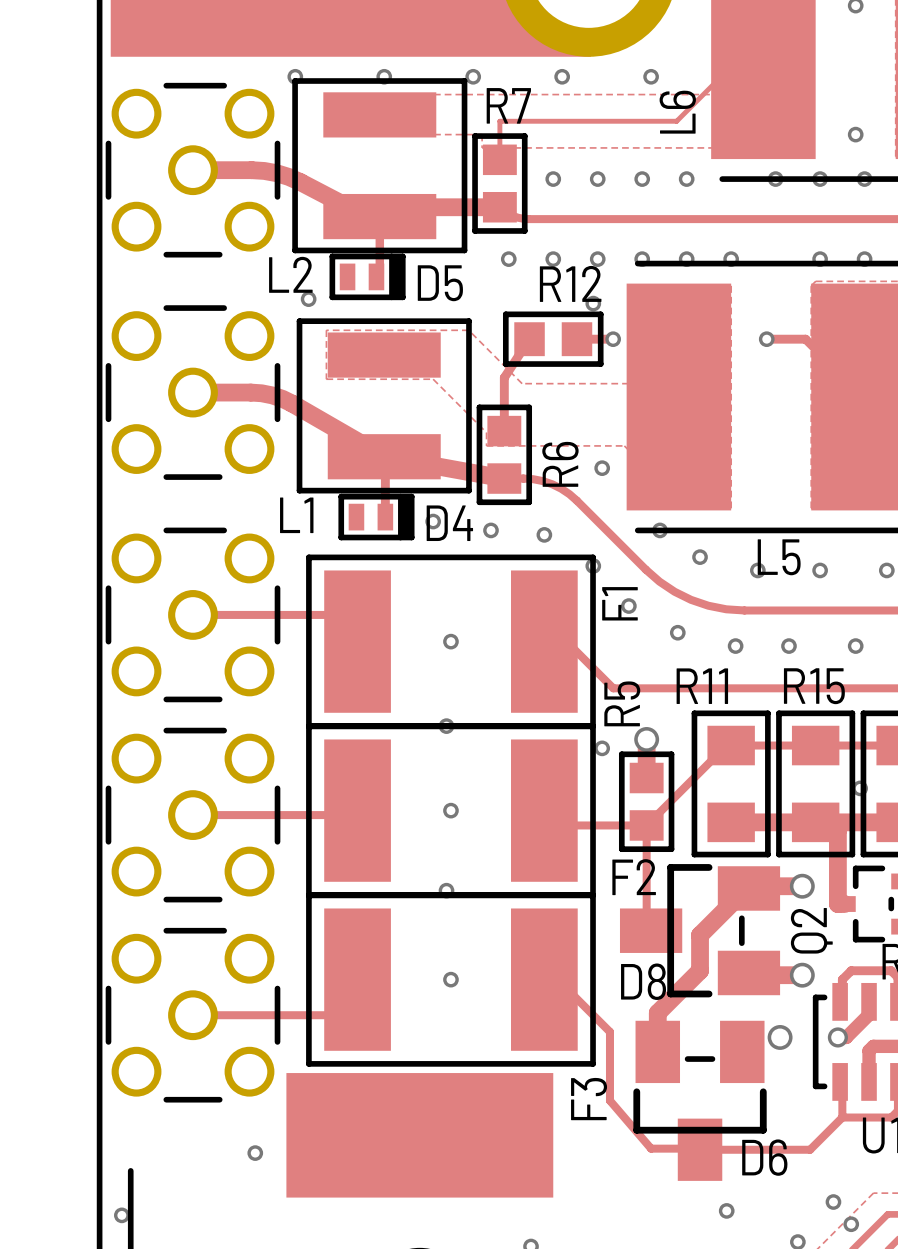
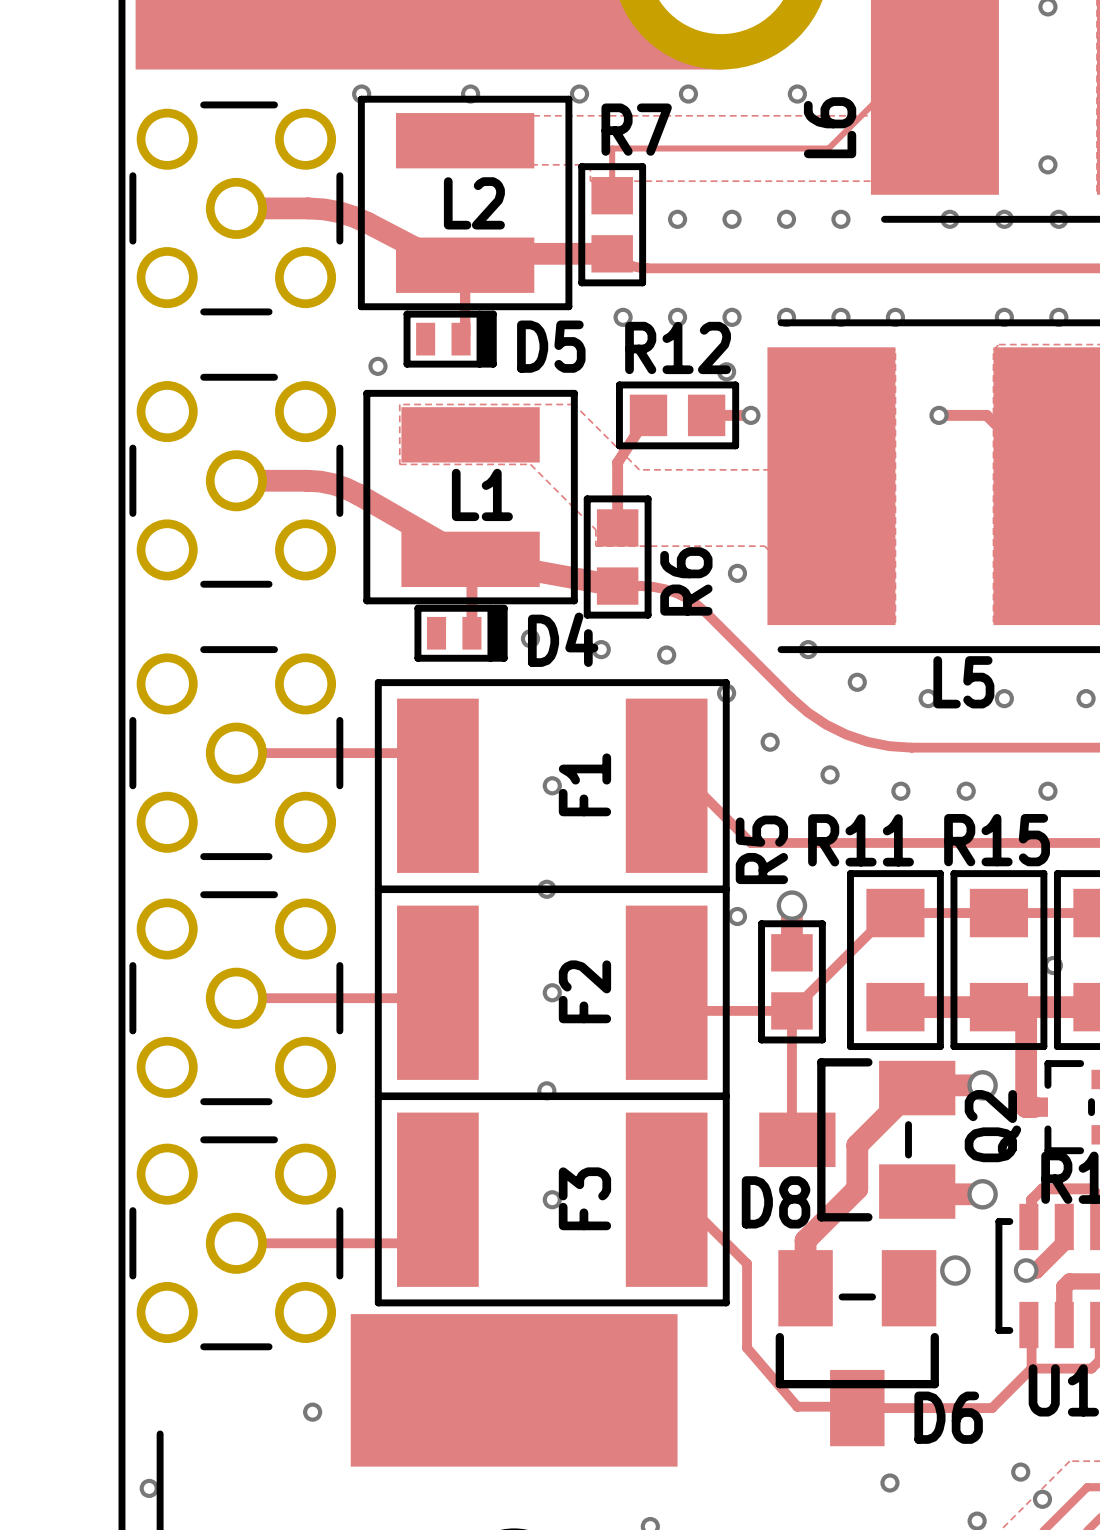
L2 name position: L2 (290, 274) -> L2 (474, 203)
L1 name position: L1 (296, 515) -> L1 (482, 494)
F1 name position: F1 (619, 603) -> F1 (584, 784)
F2 name rotation: 0° (634, 877) -> 90° counterclockwise (584, 991)
F2 name position: F2 (634, 877) -> F2 (584, 991)
F3 name position: F3 (589, 1099) -> F3 (584, 1198)

